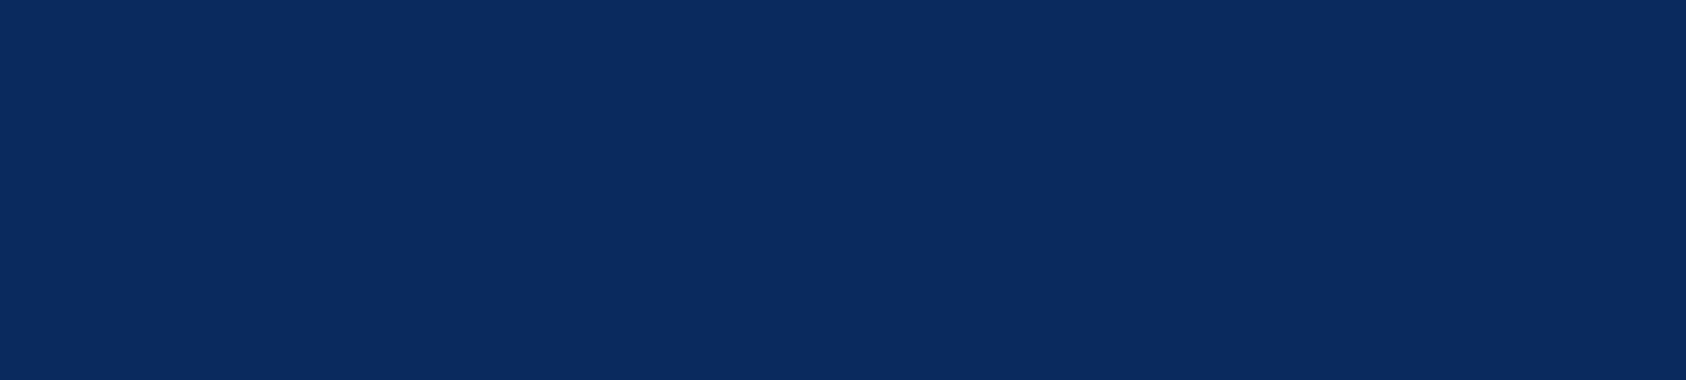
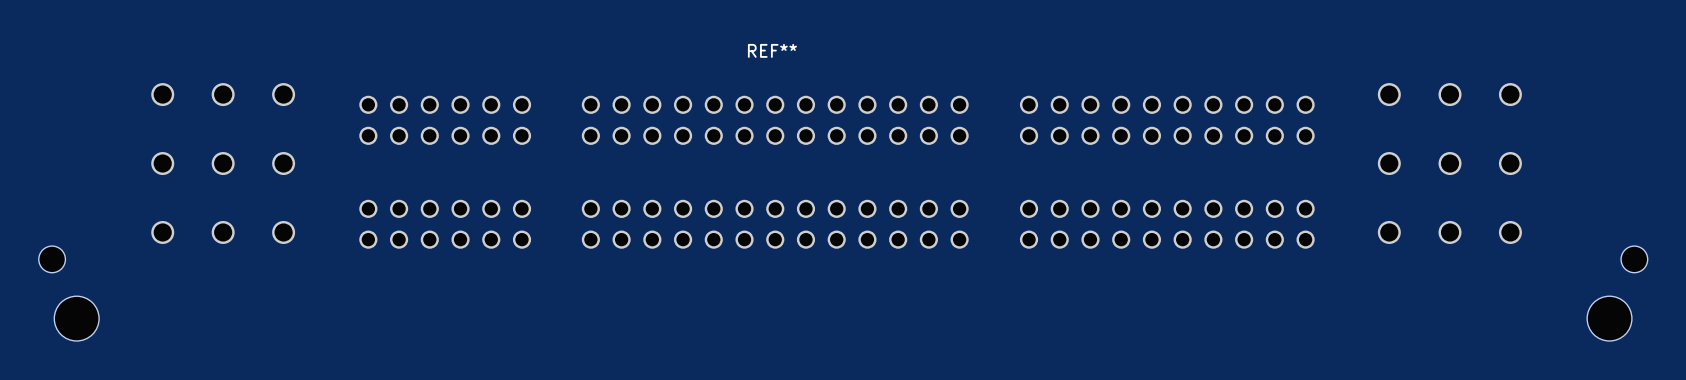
REF**: none -> (843, 212)

